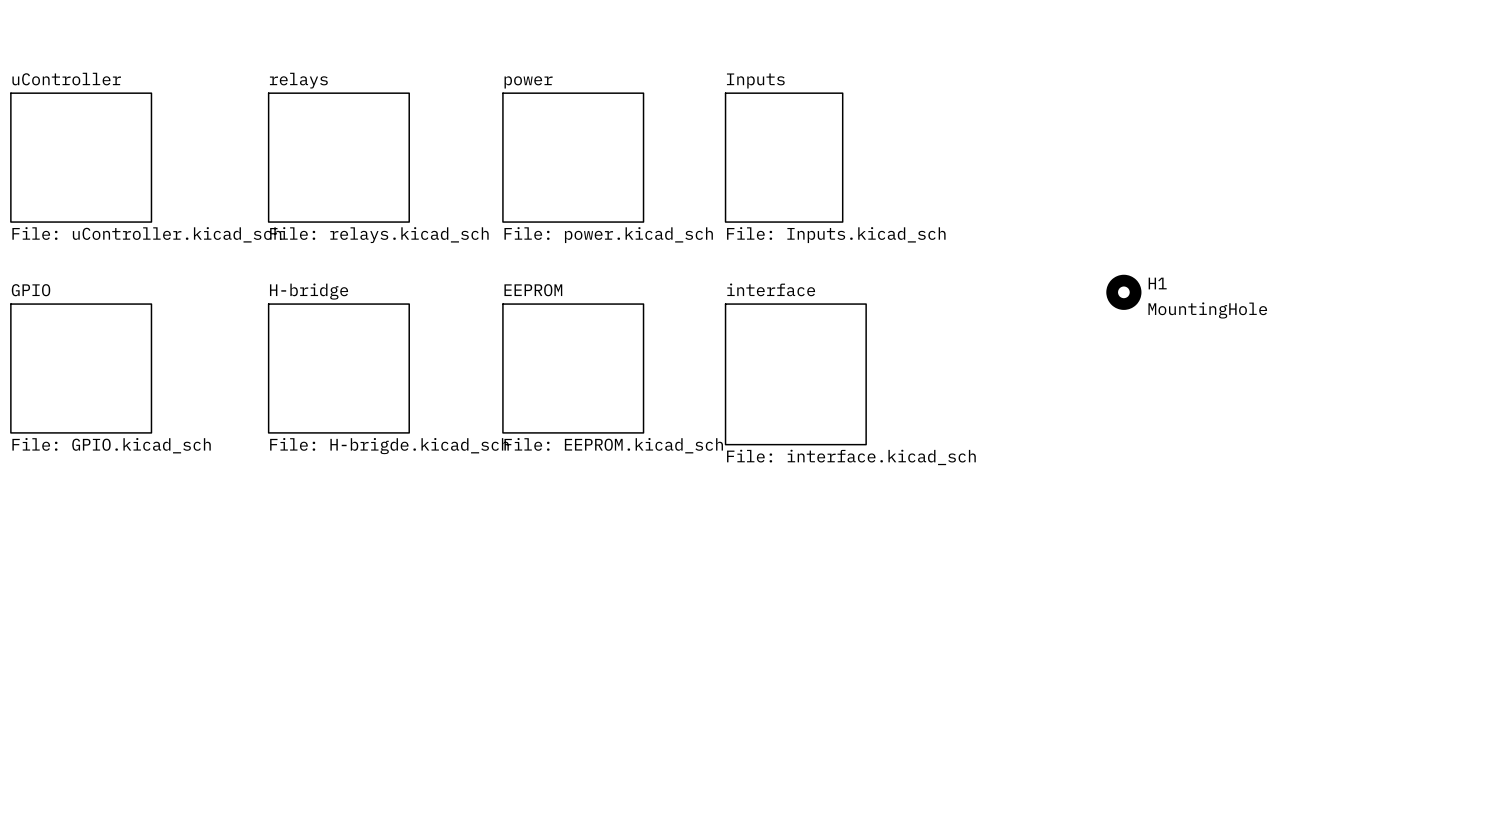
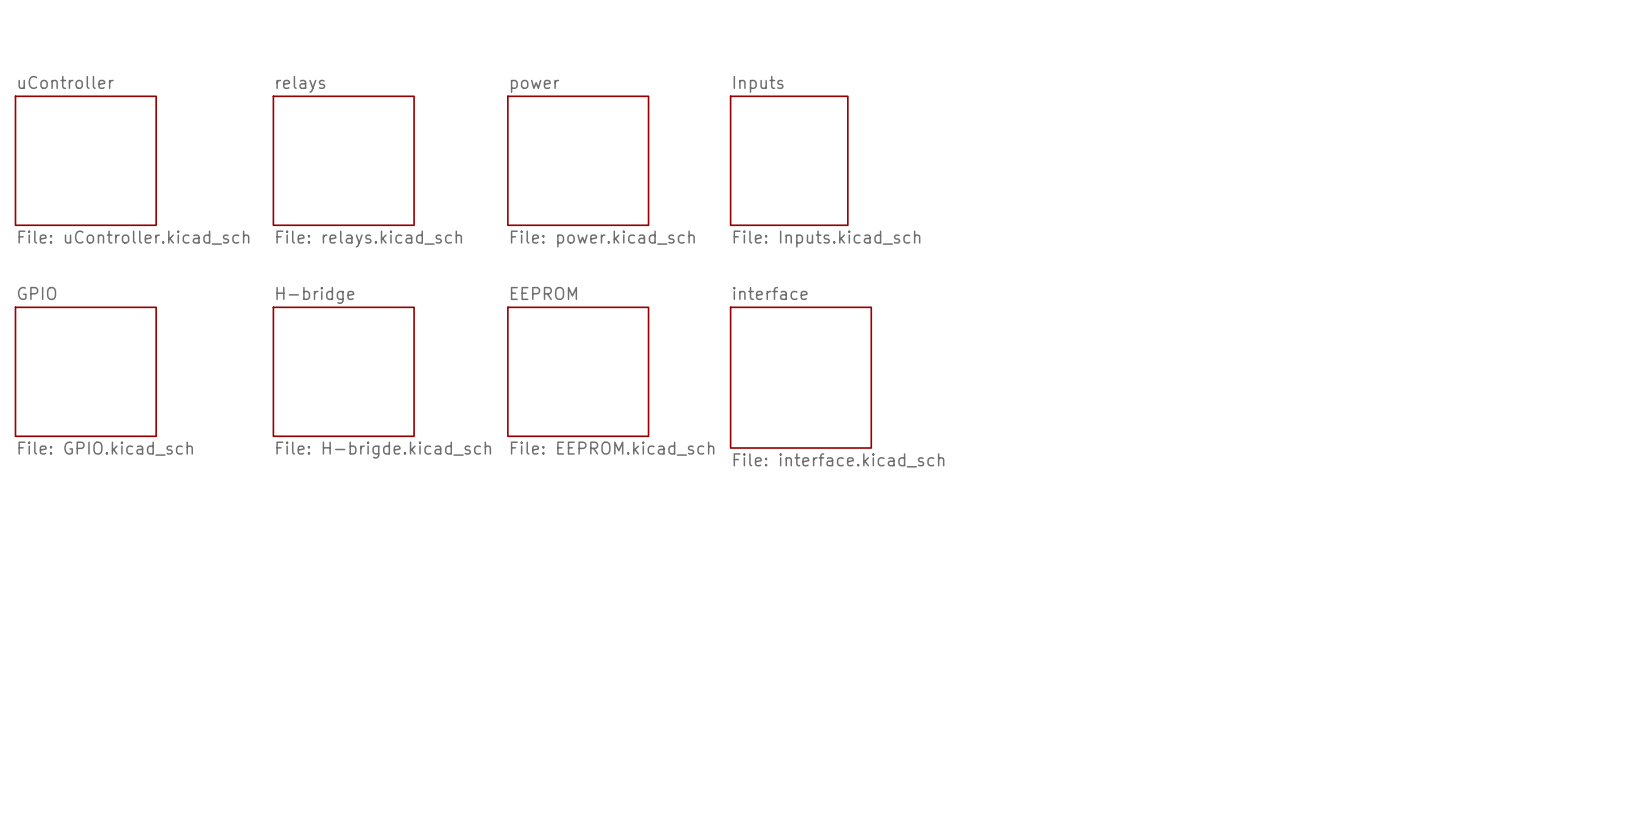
H1: MountingHole (1123, 292) -> none

